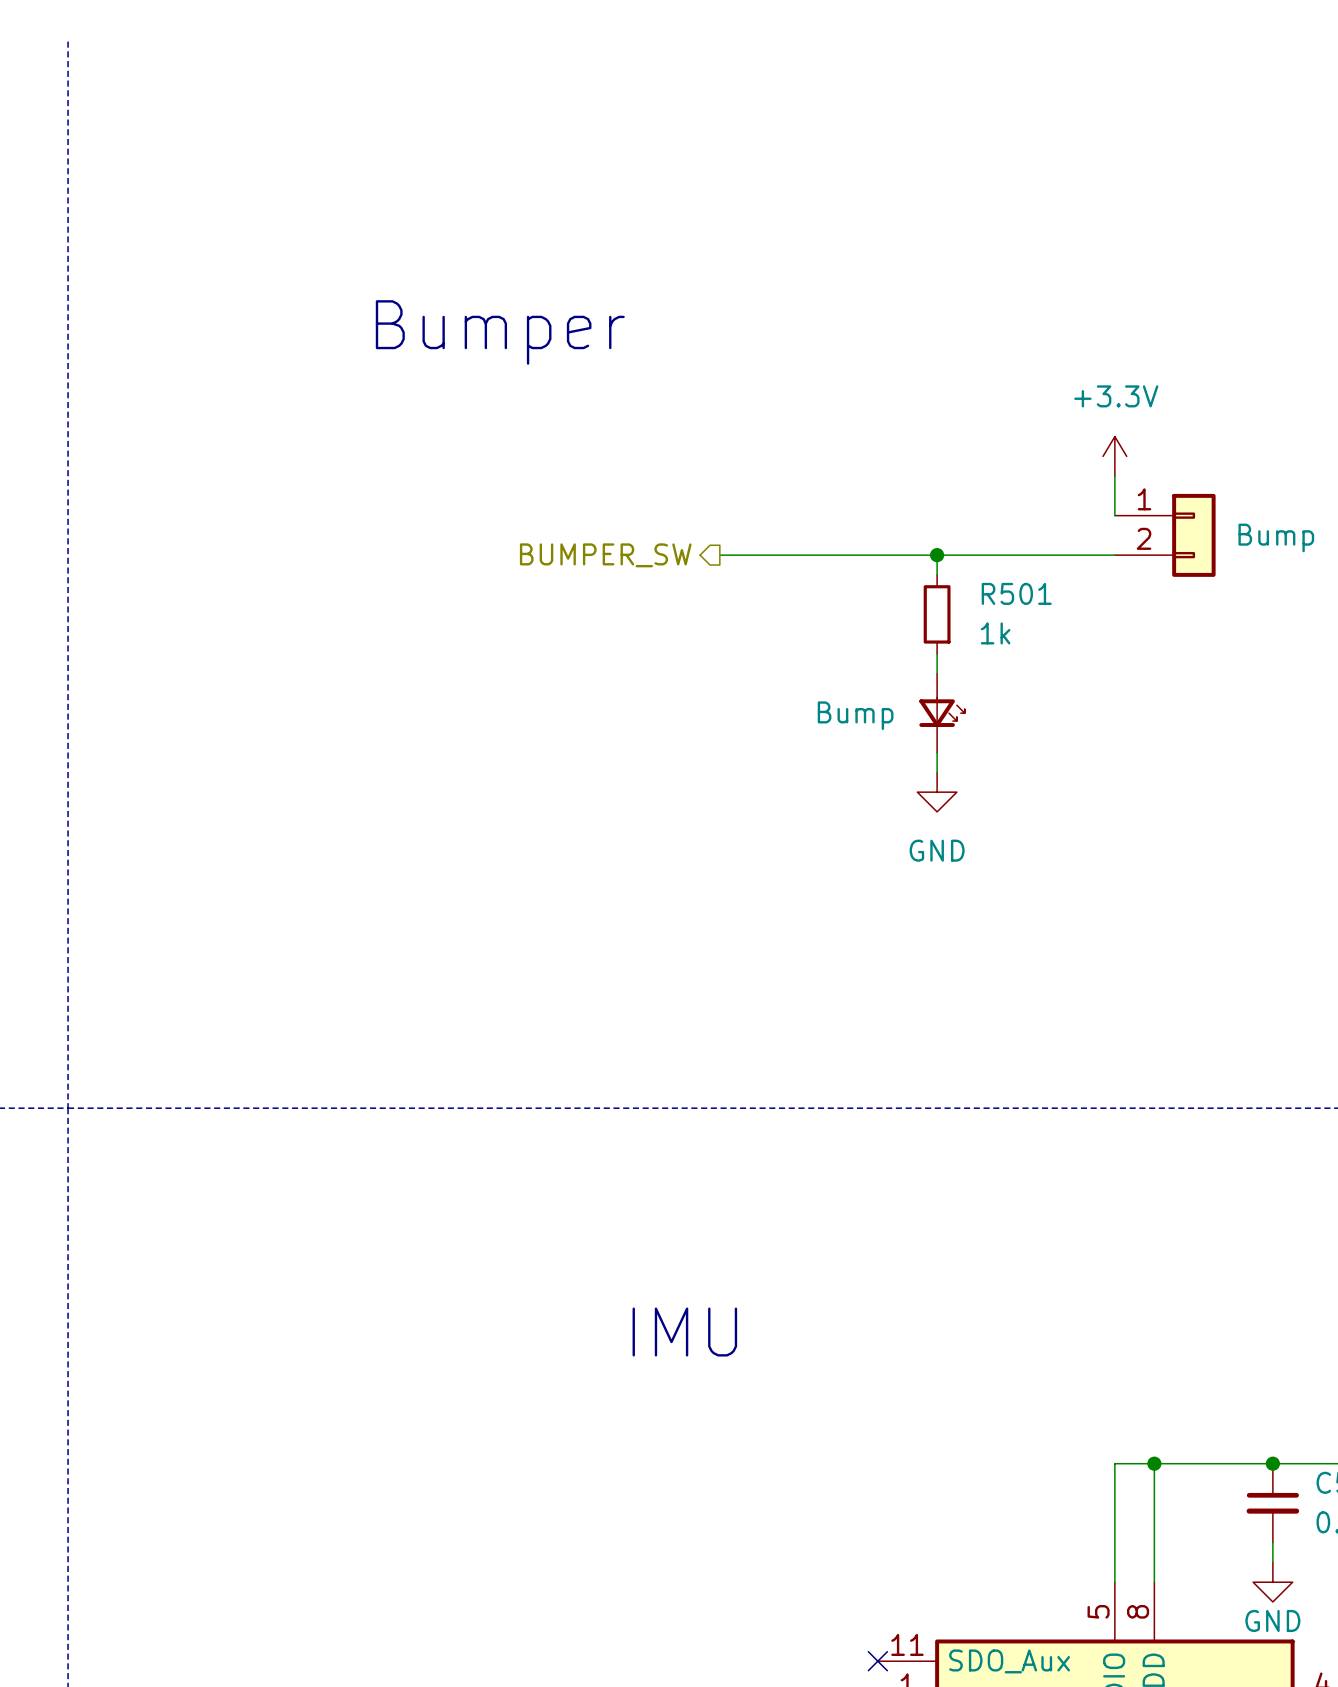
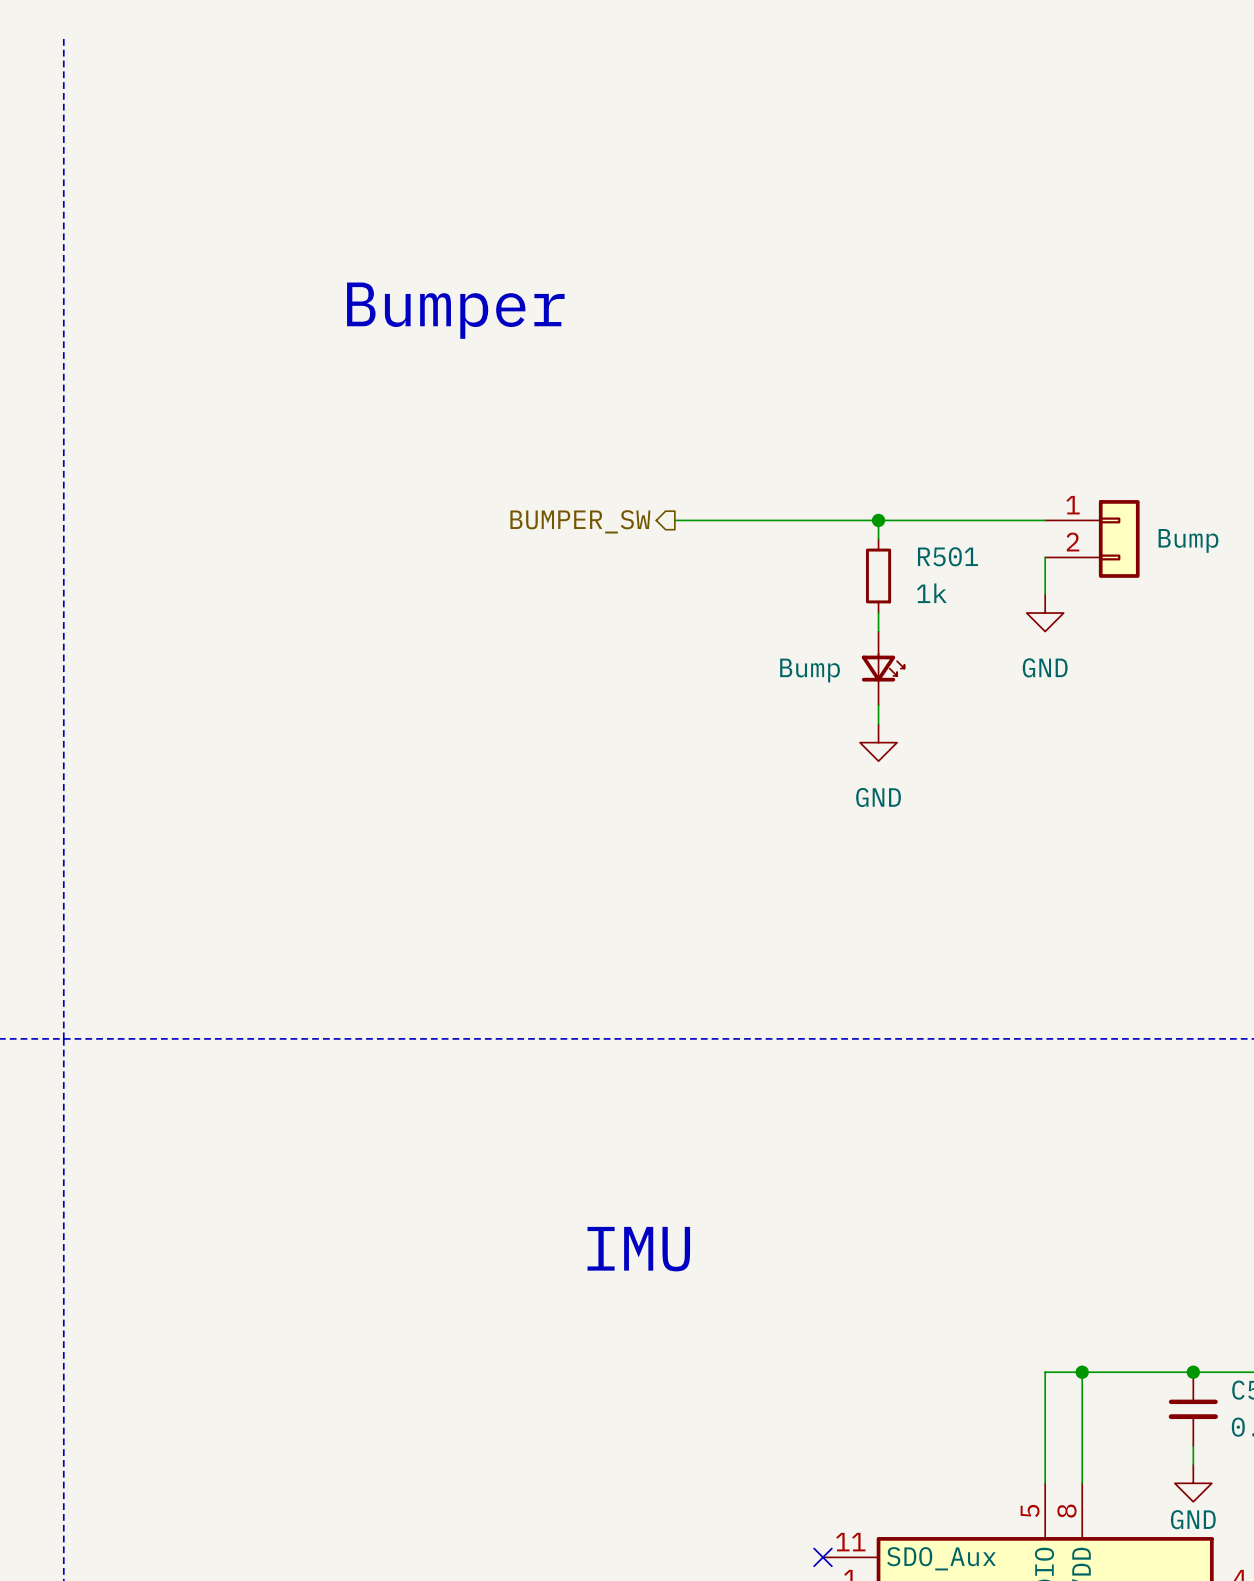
power symbol: +3.3V (1114, 456) -> none
wire: (1114, 476) (1114, 515) -> (1045, 557) (1045, 594)
part position: (1165, 535) -> (1092, 538)
power symbol: none -> GND (1045, 613)

